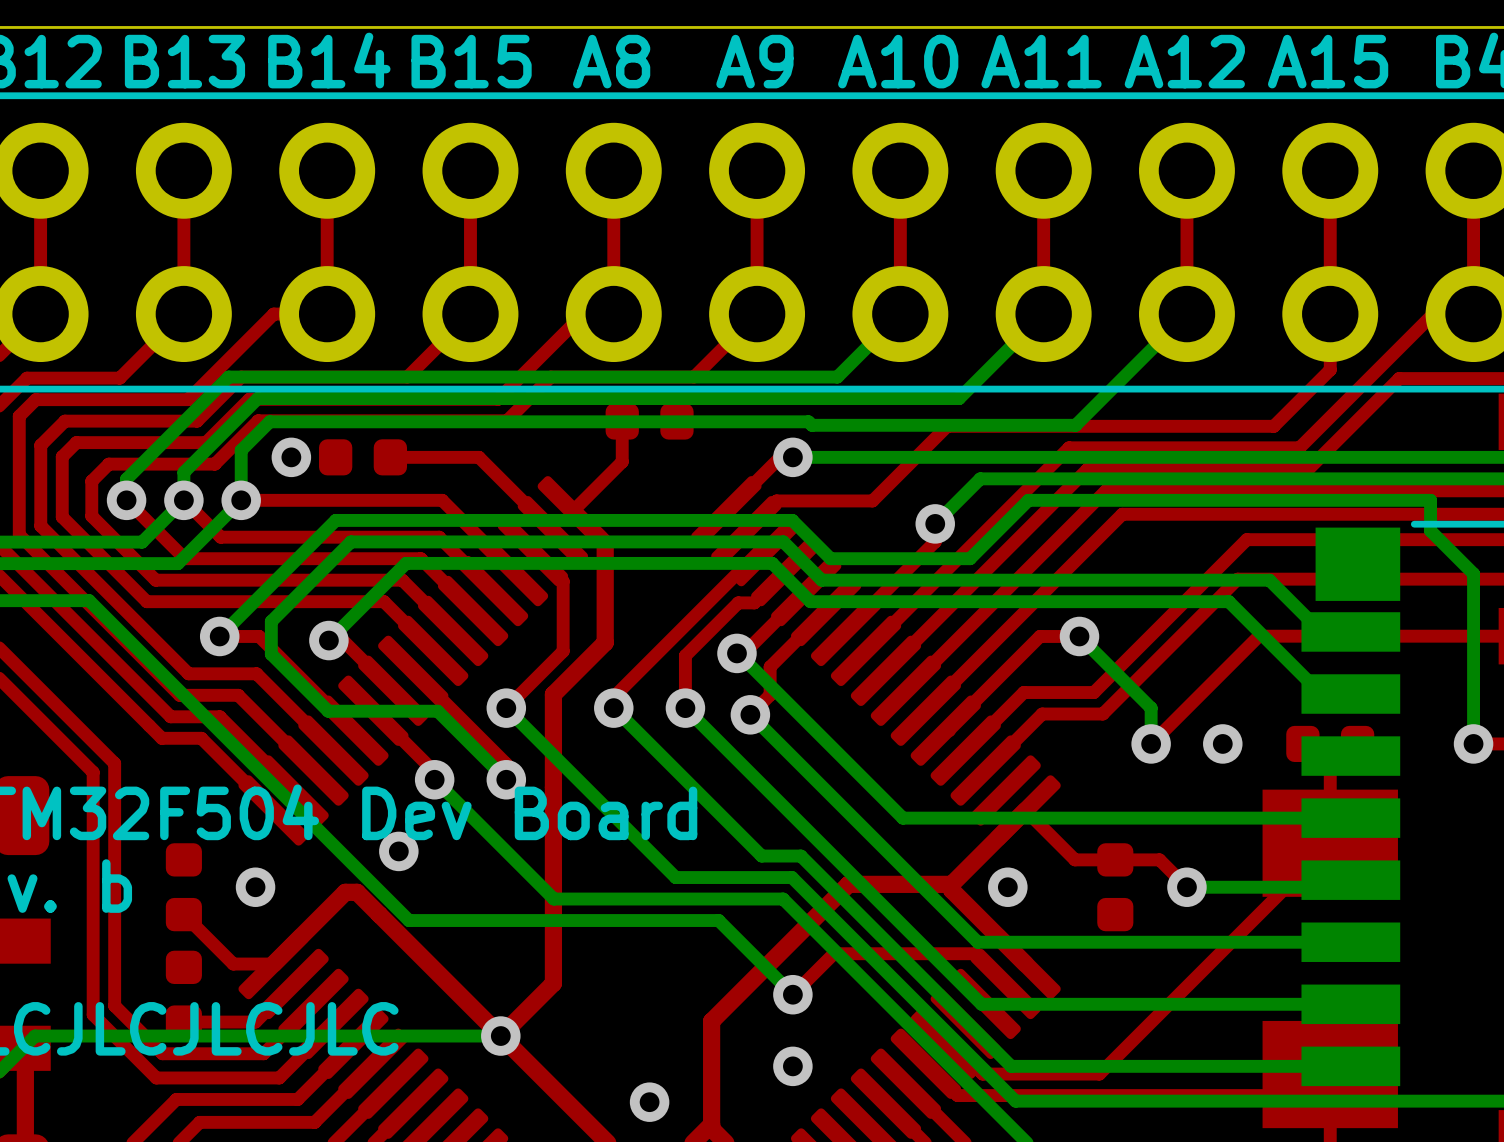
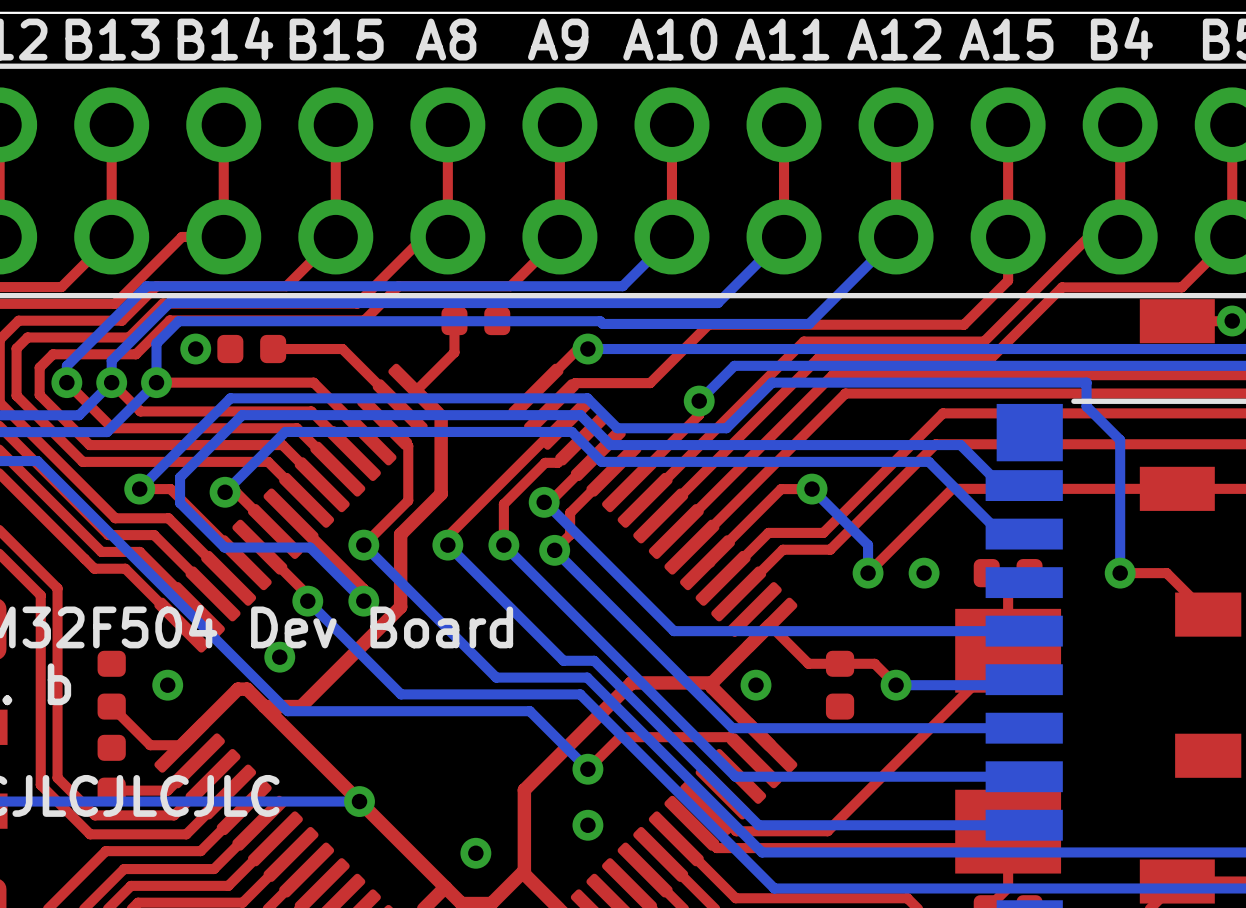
top track: (553, 787) (553, 983) (500, 1036) -> (400, 607) (301, 706) (264, 706)

